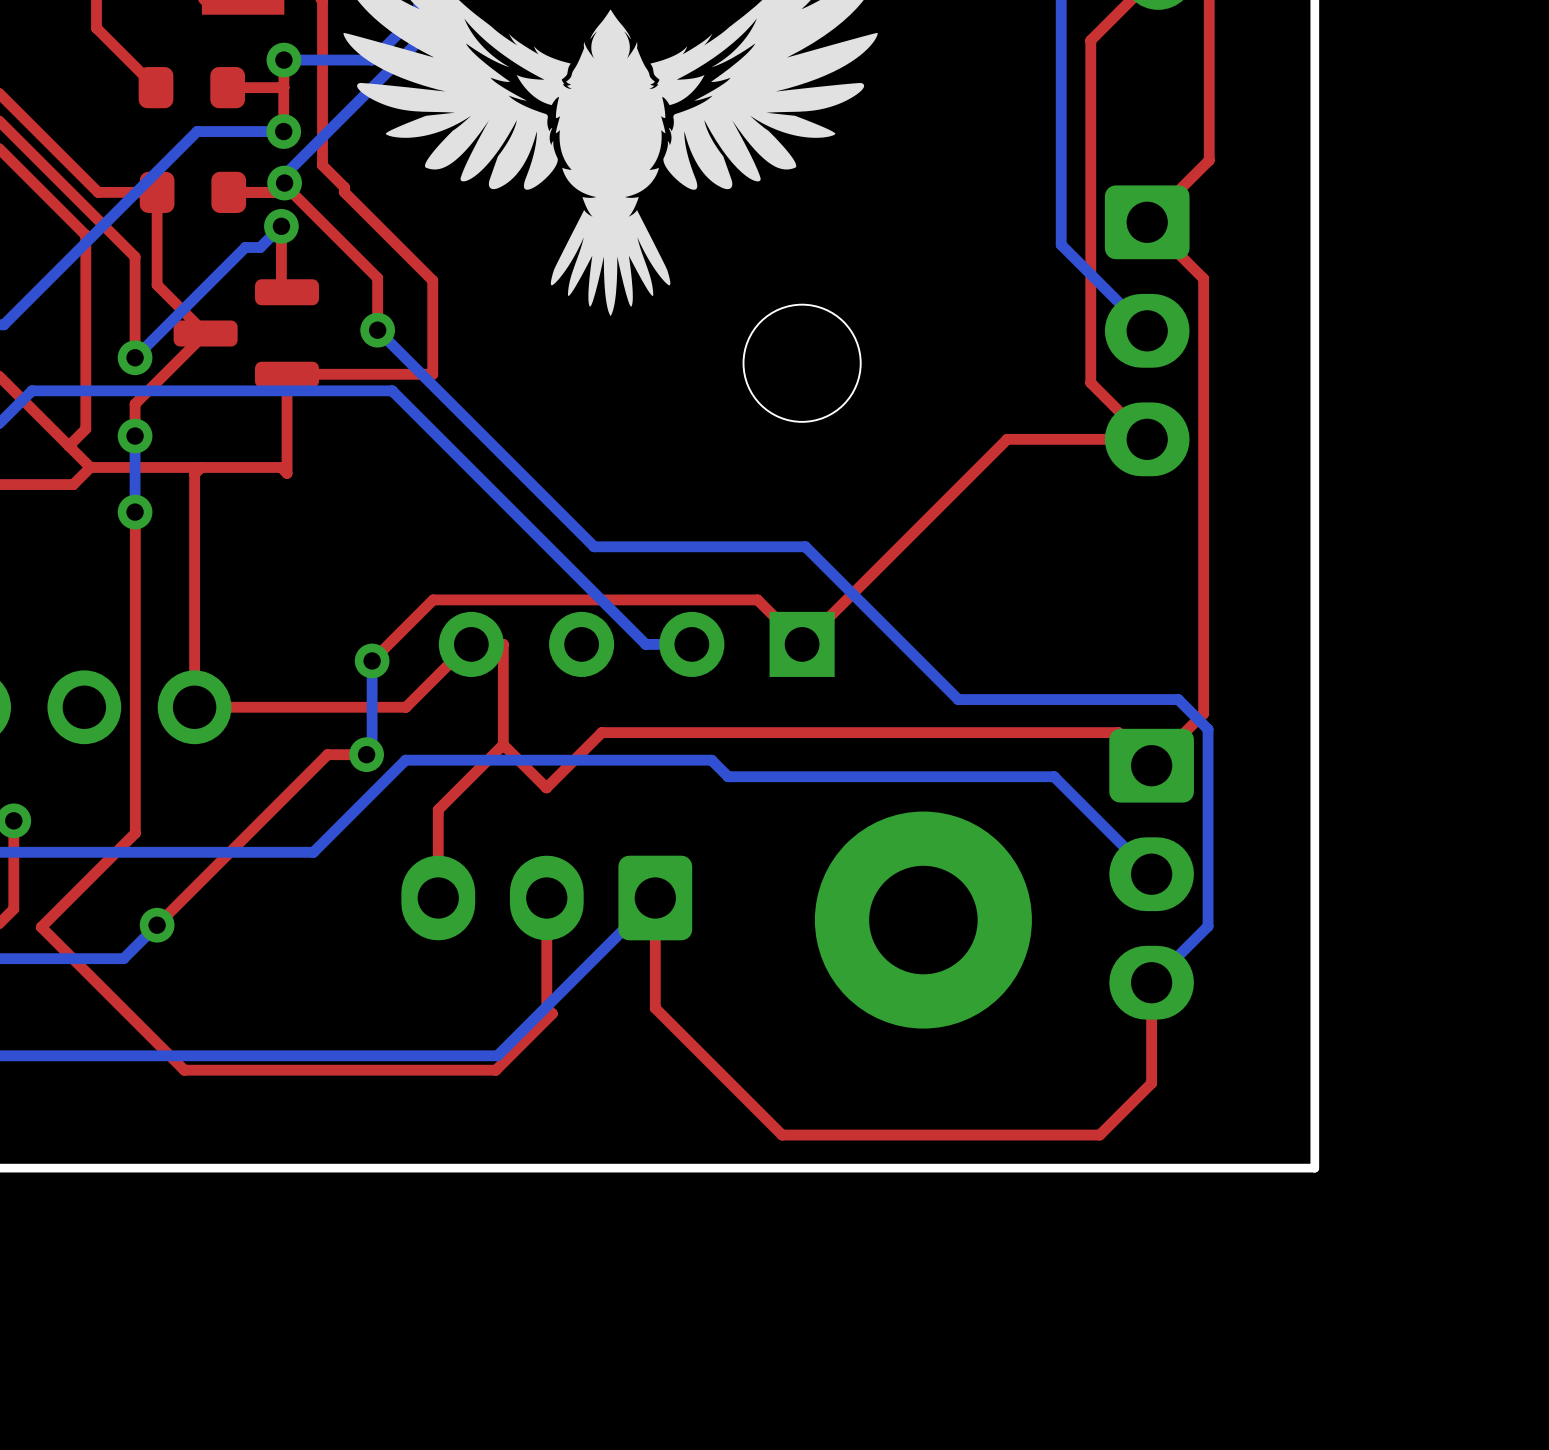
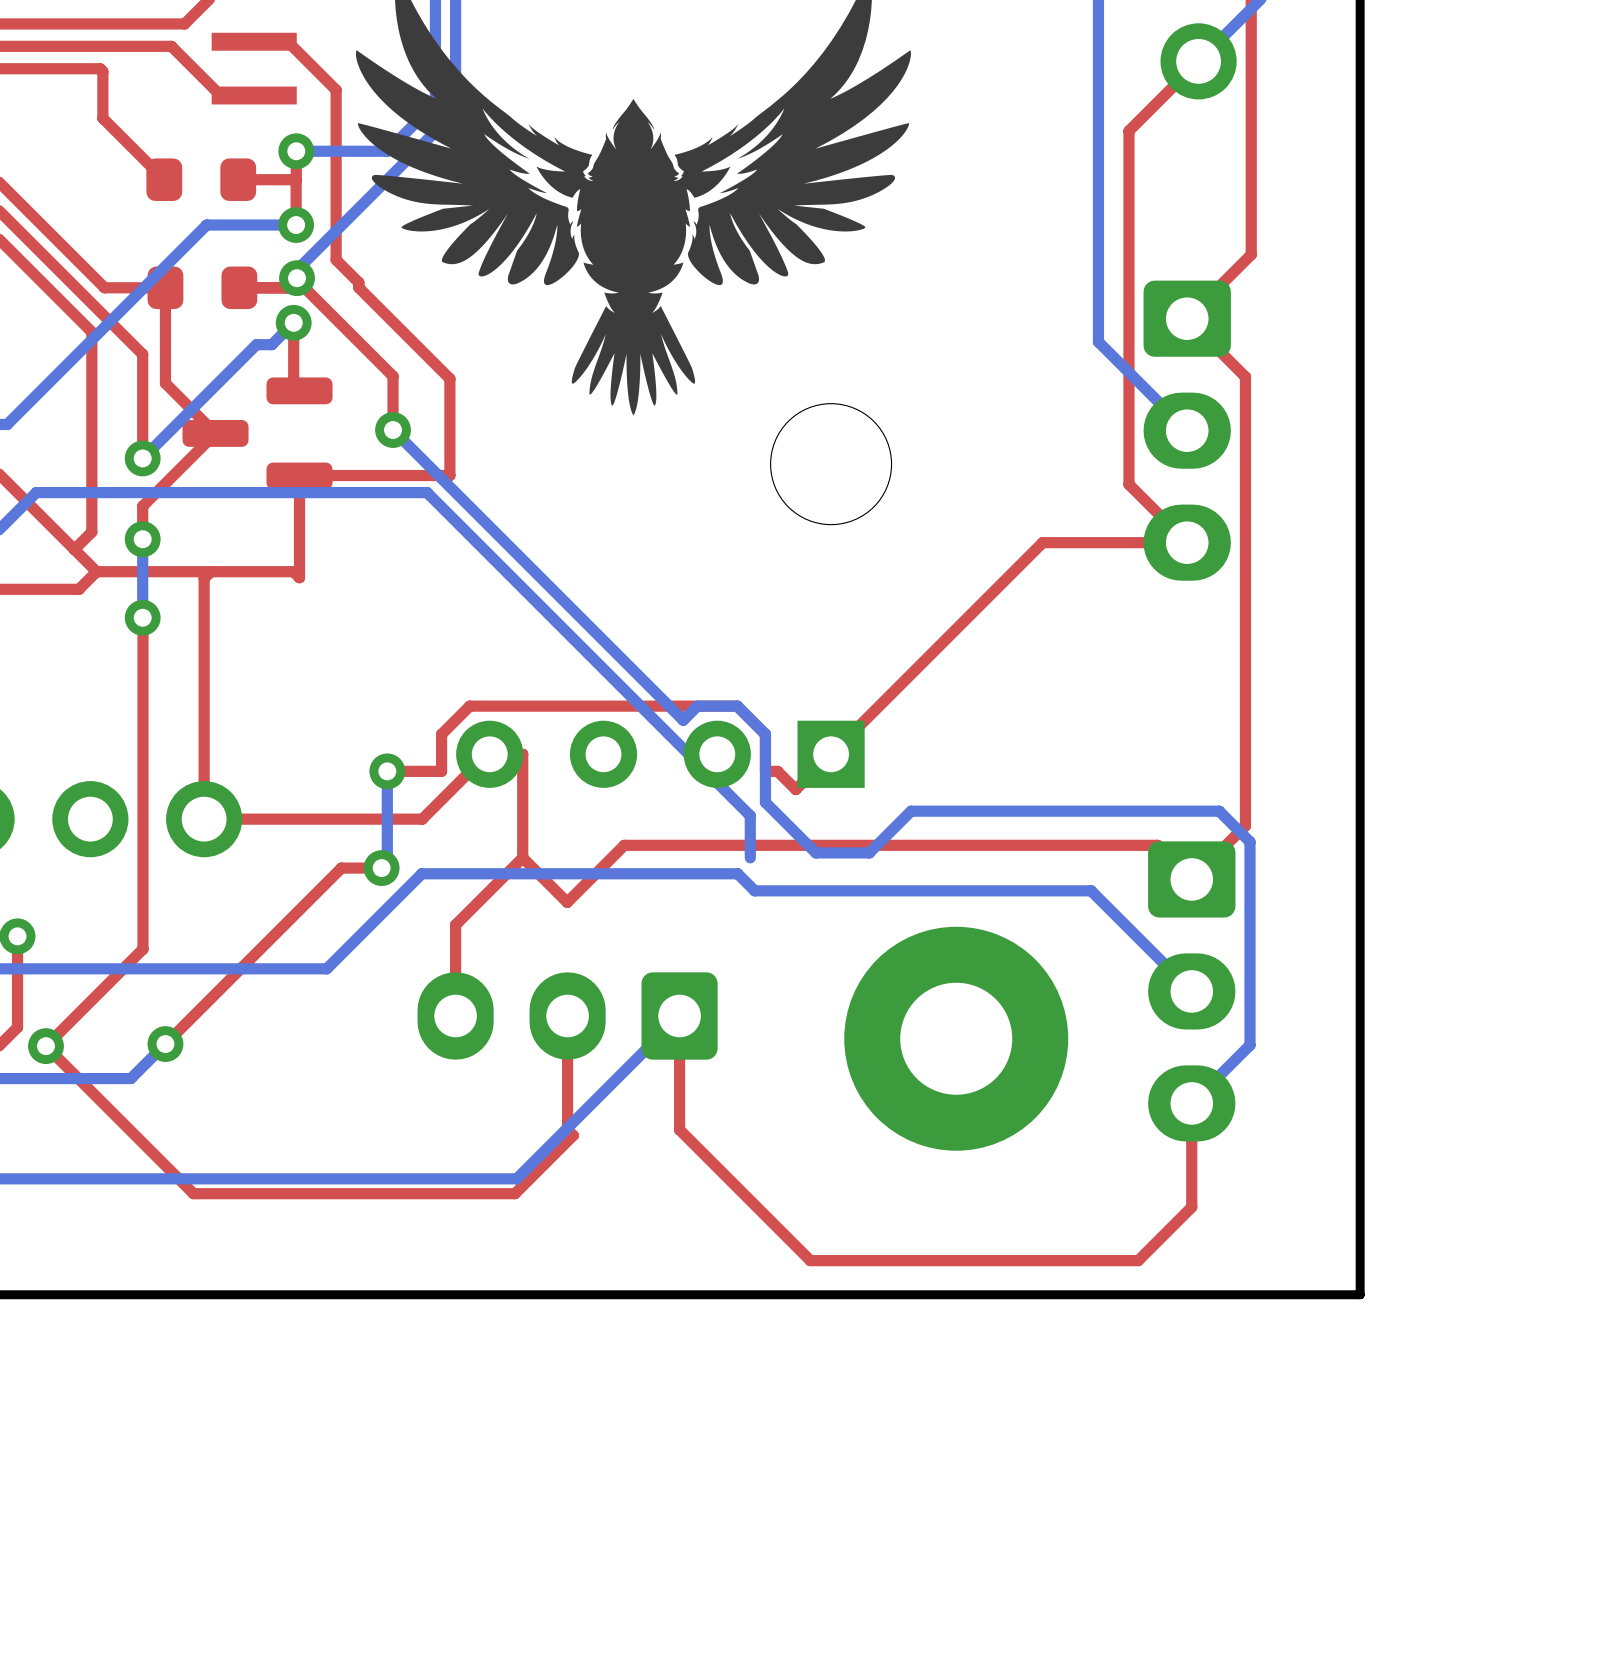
bottom track: (392, 390) (645, 644) (691, 644) -> (408, 492) (427, 492) (750, 815) (750, 857)
bottom track: (594, 546) (805, 546) (958, 699) -> (616, 653) (683, 720) (697, 706) (737, 706) (765, 734) (765, 802) (815, 852) (869, 852) (911, 811) (992, 811)
top track: (802, 644) (757, 599) (433, 599) (372, 660) -> (831, 754) (795, 789) (777, 771) (765, 771) (765, 734) (737, 706) (469, 706) (441, 734) (441, 771) (387, 771)
via: none -> (45, 1046)

